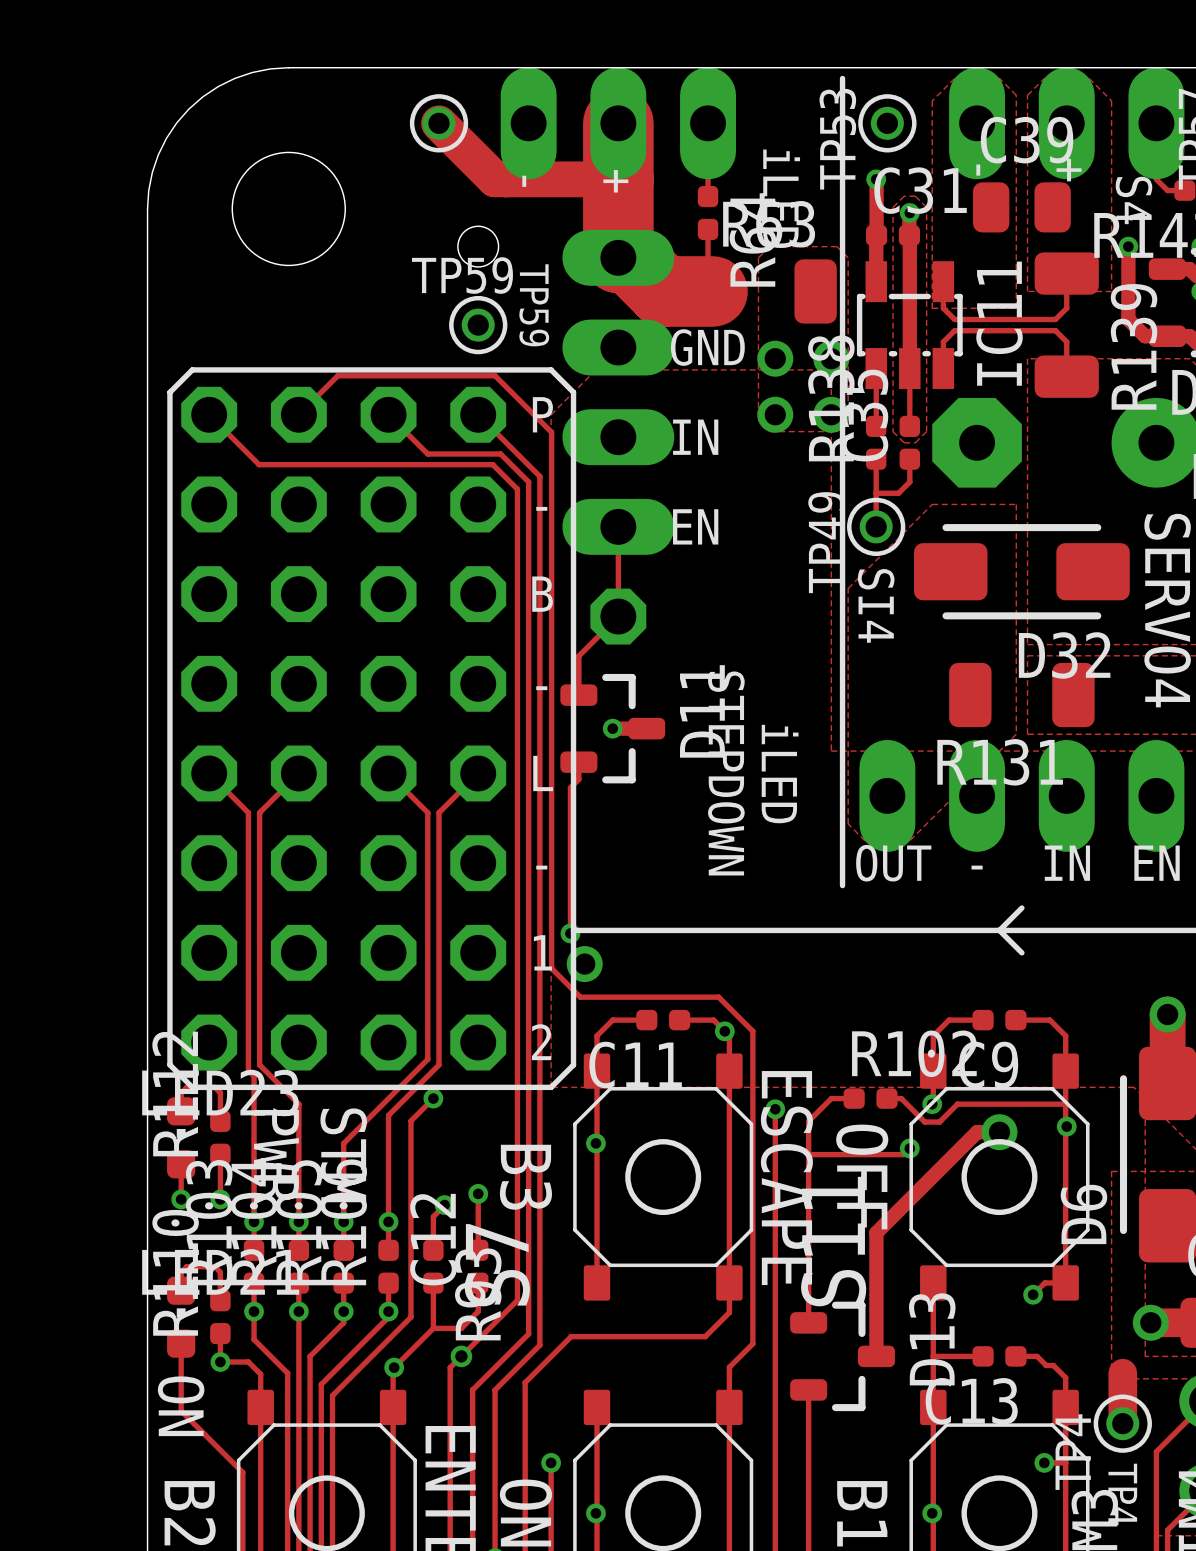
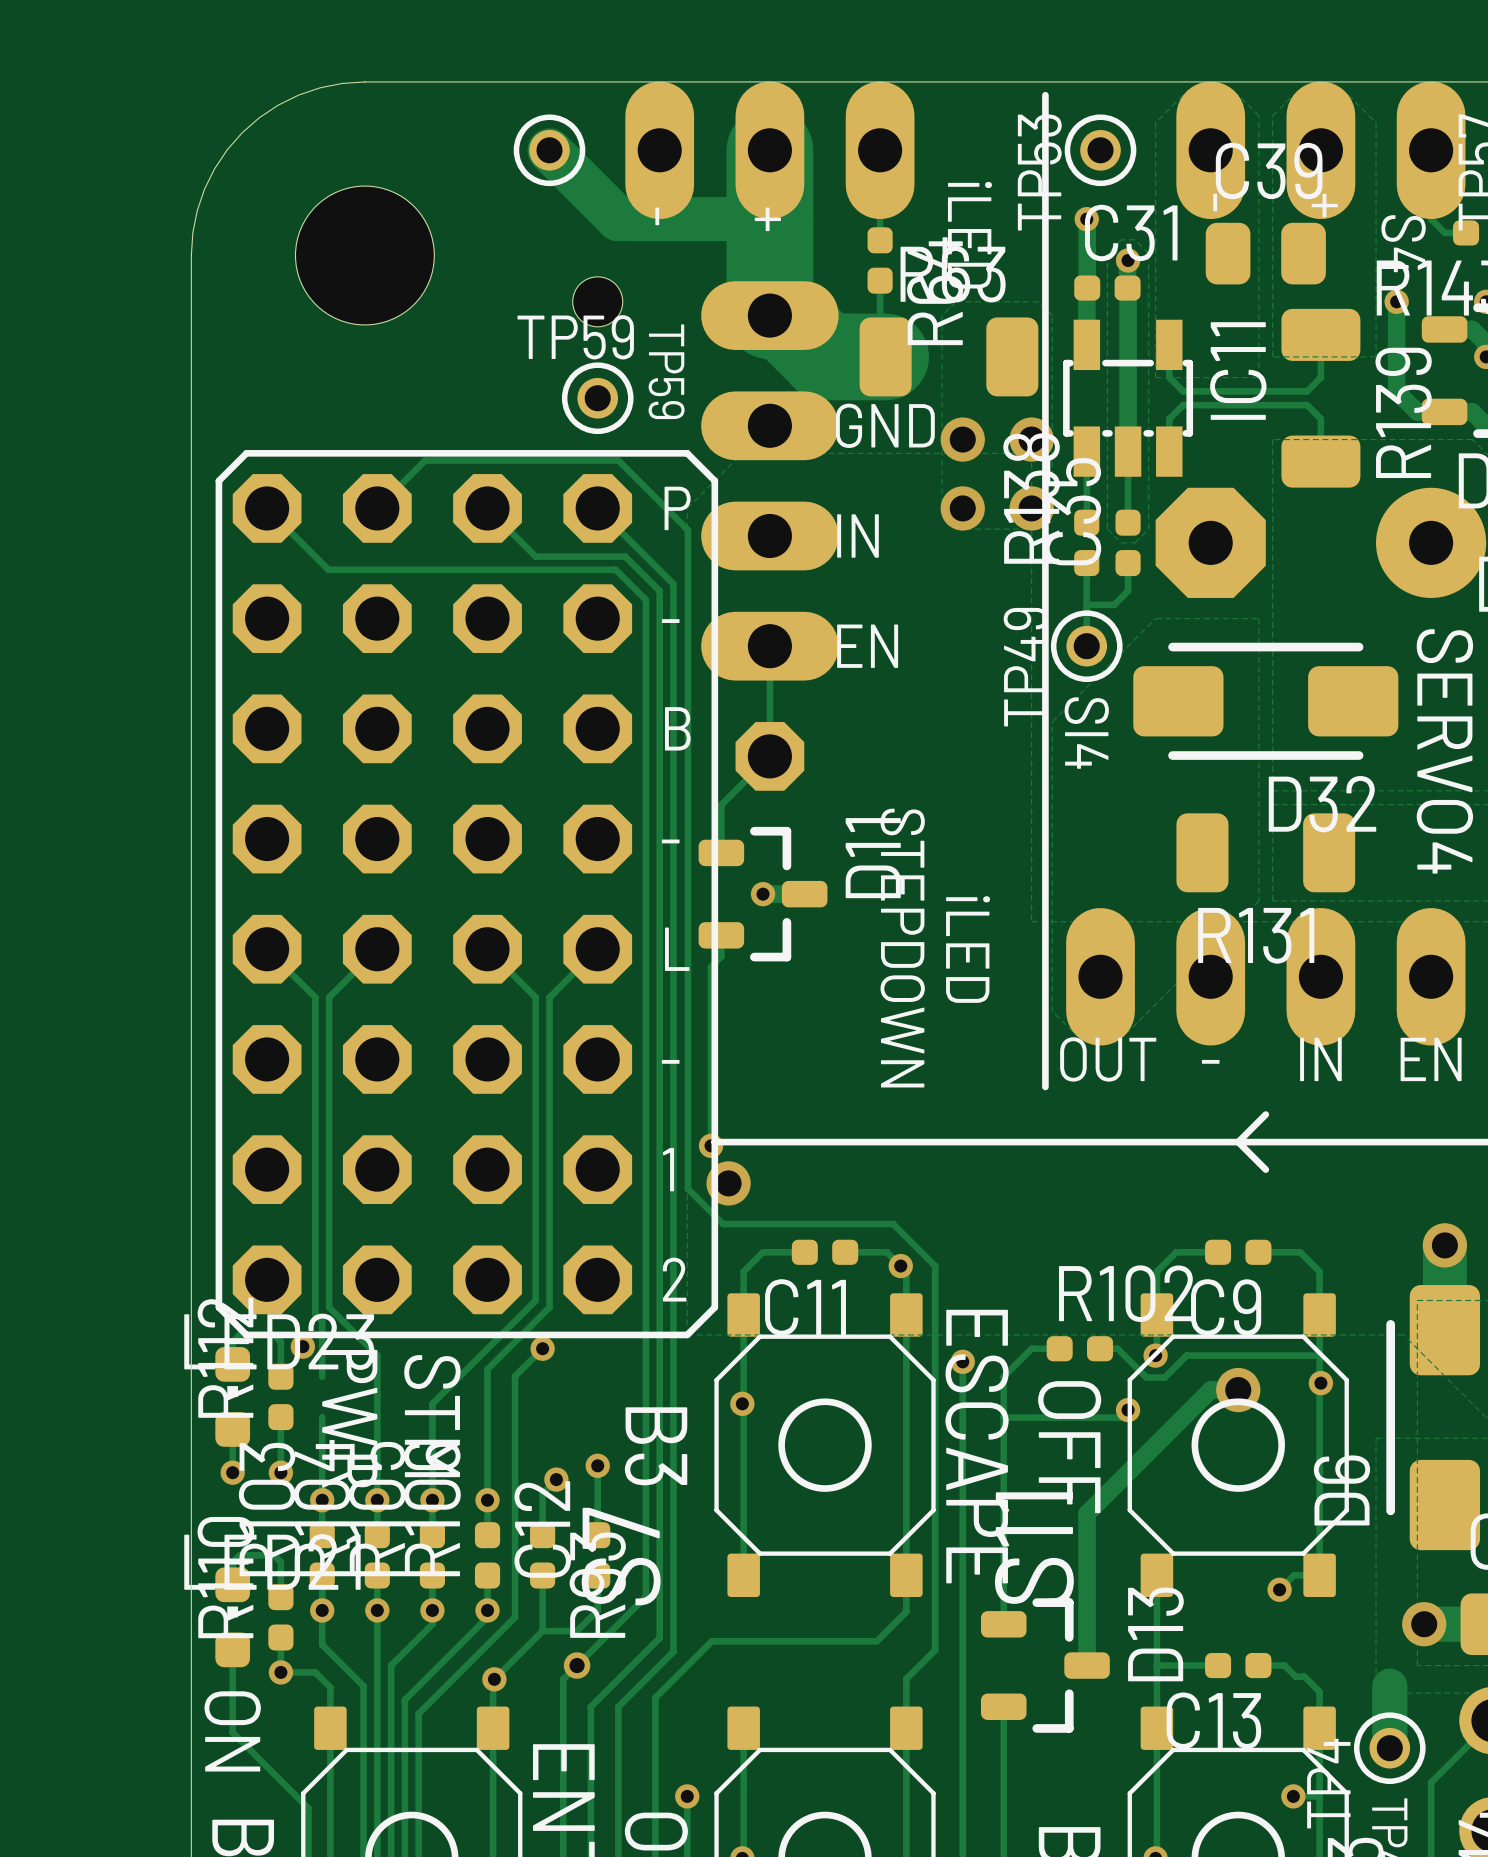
via: none -> (302, 1346)
track: (254, 1121) (254, 1154) -> none

